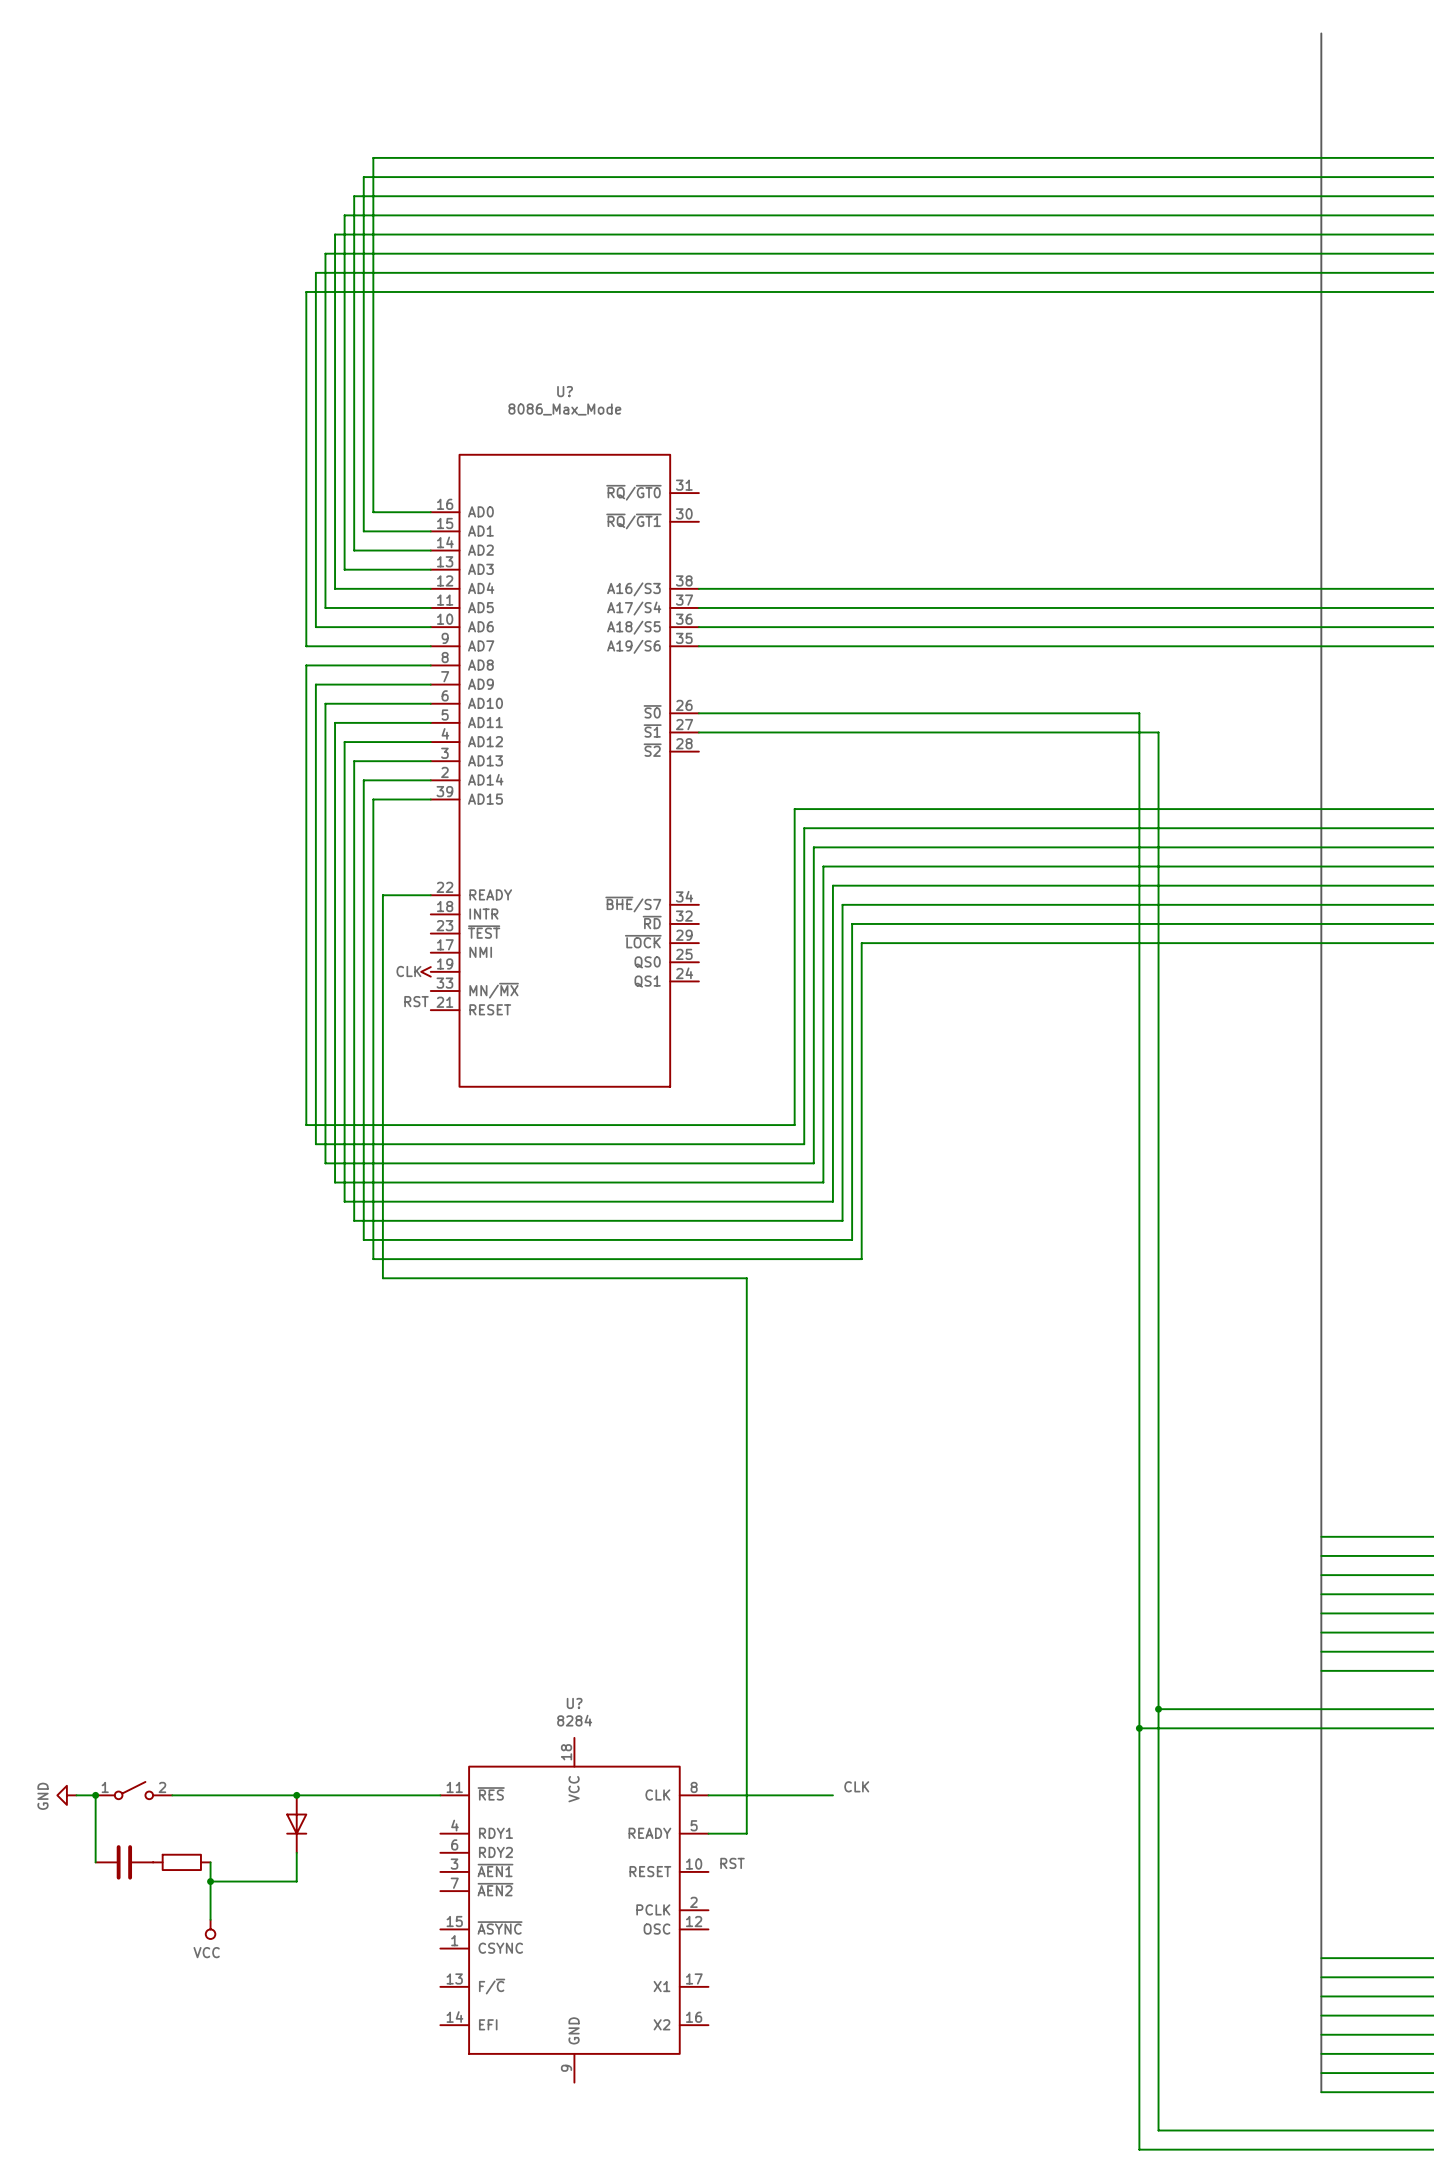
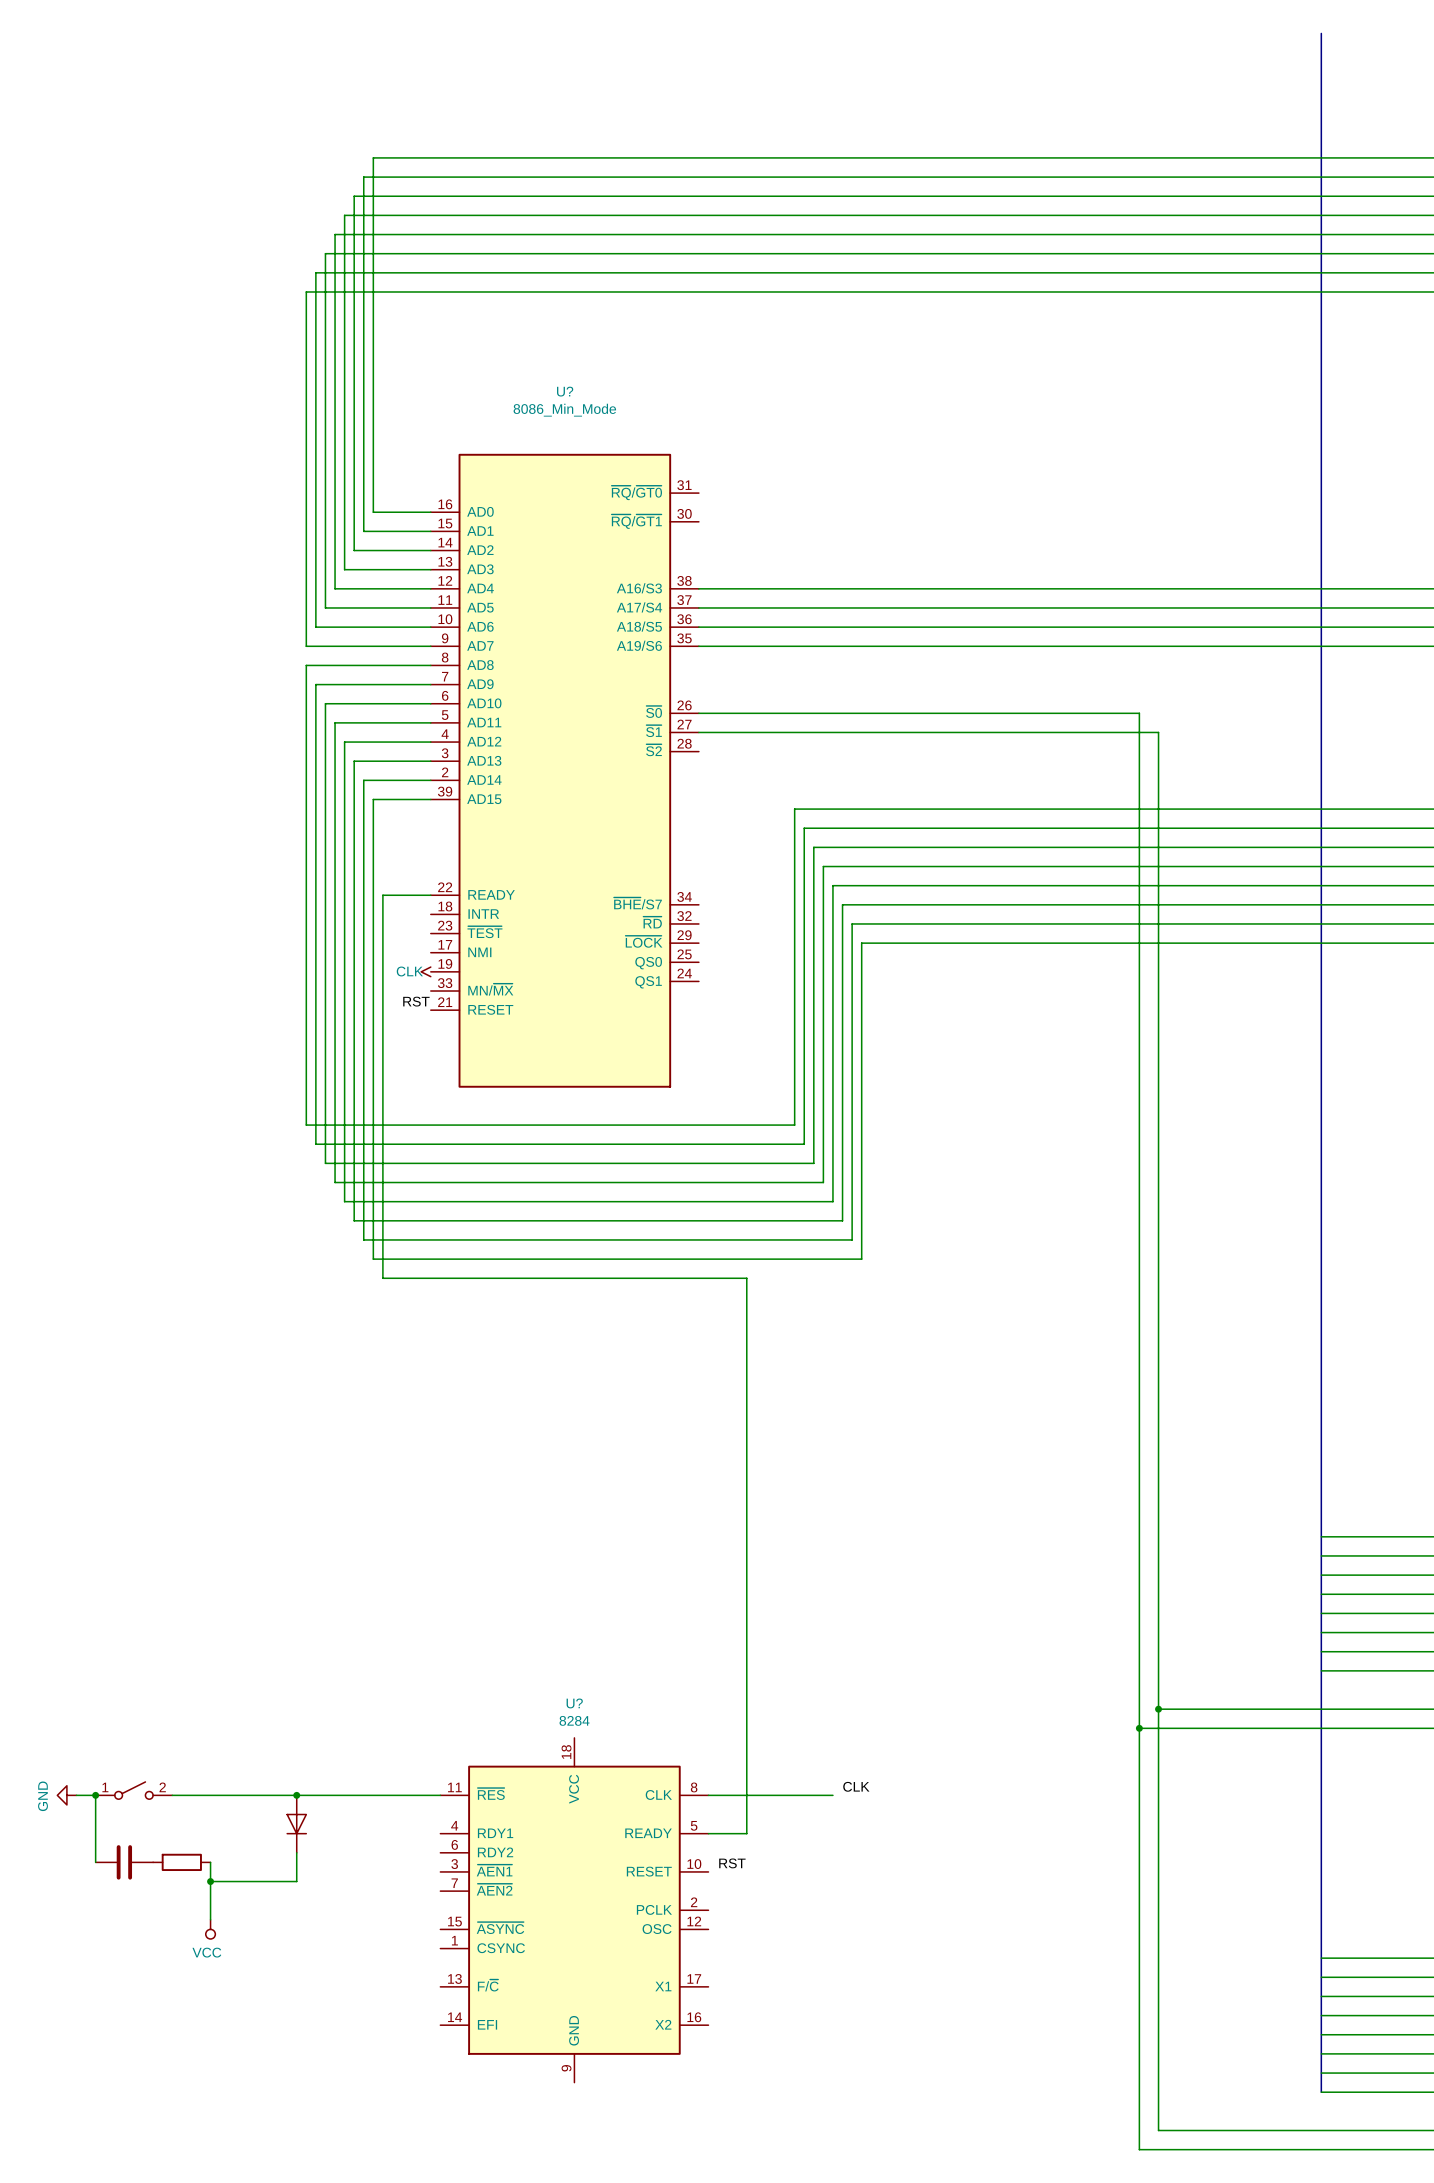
U? value: 8086_Max_Mode (564, 409) -> 8086_Min_Mode (564, 410)

